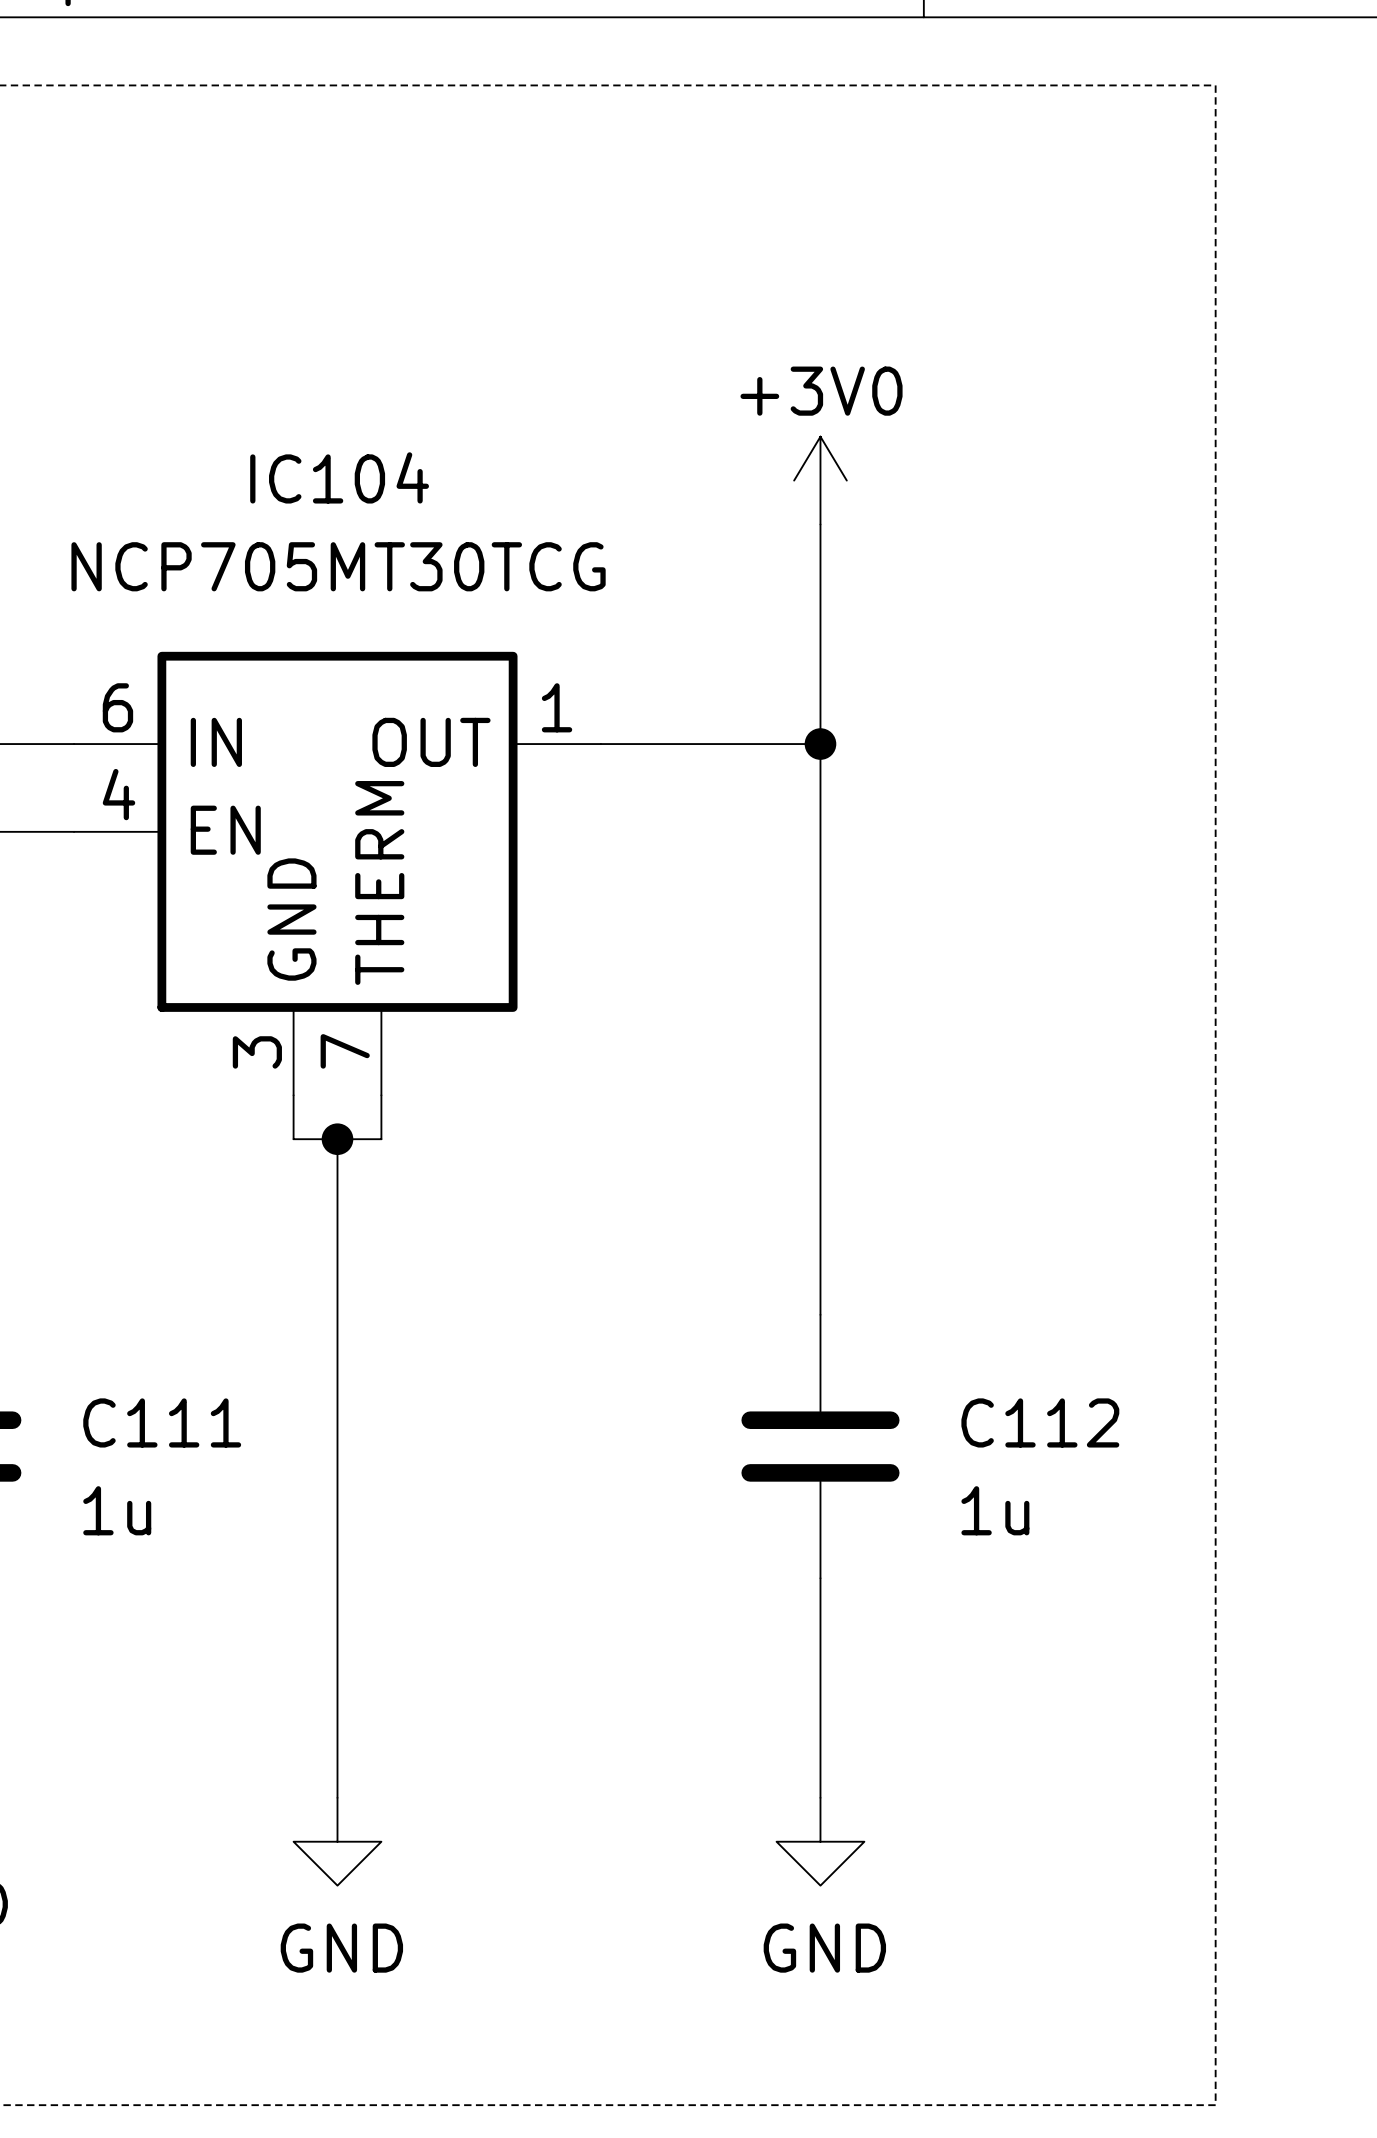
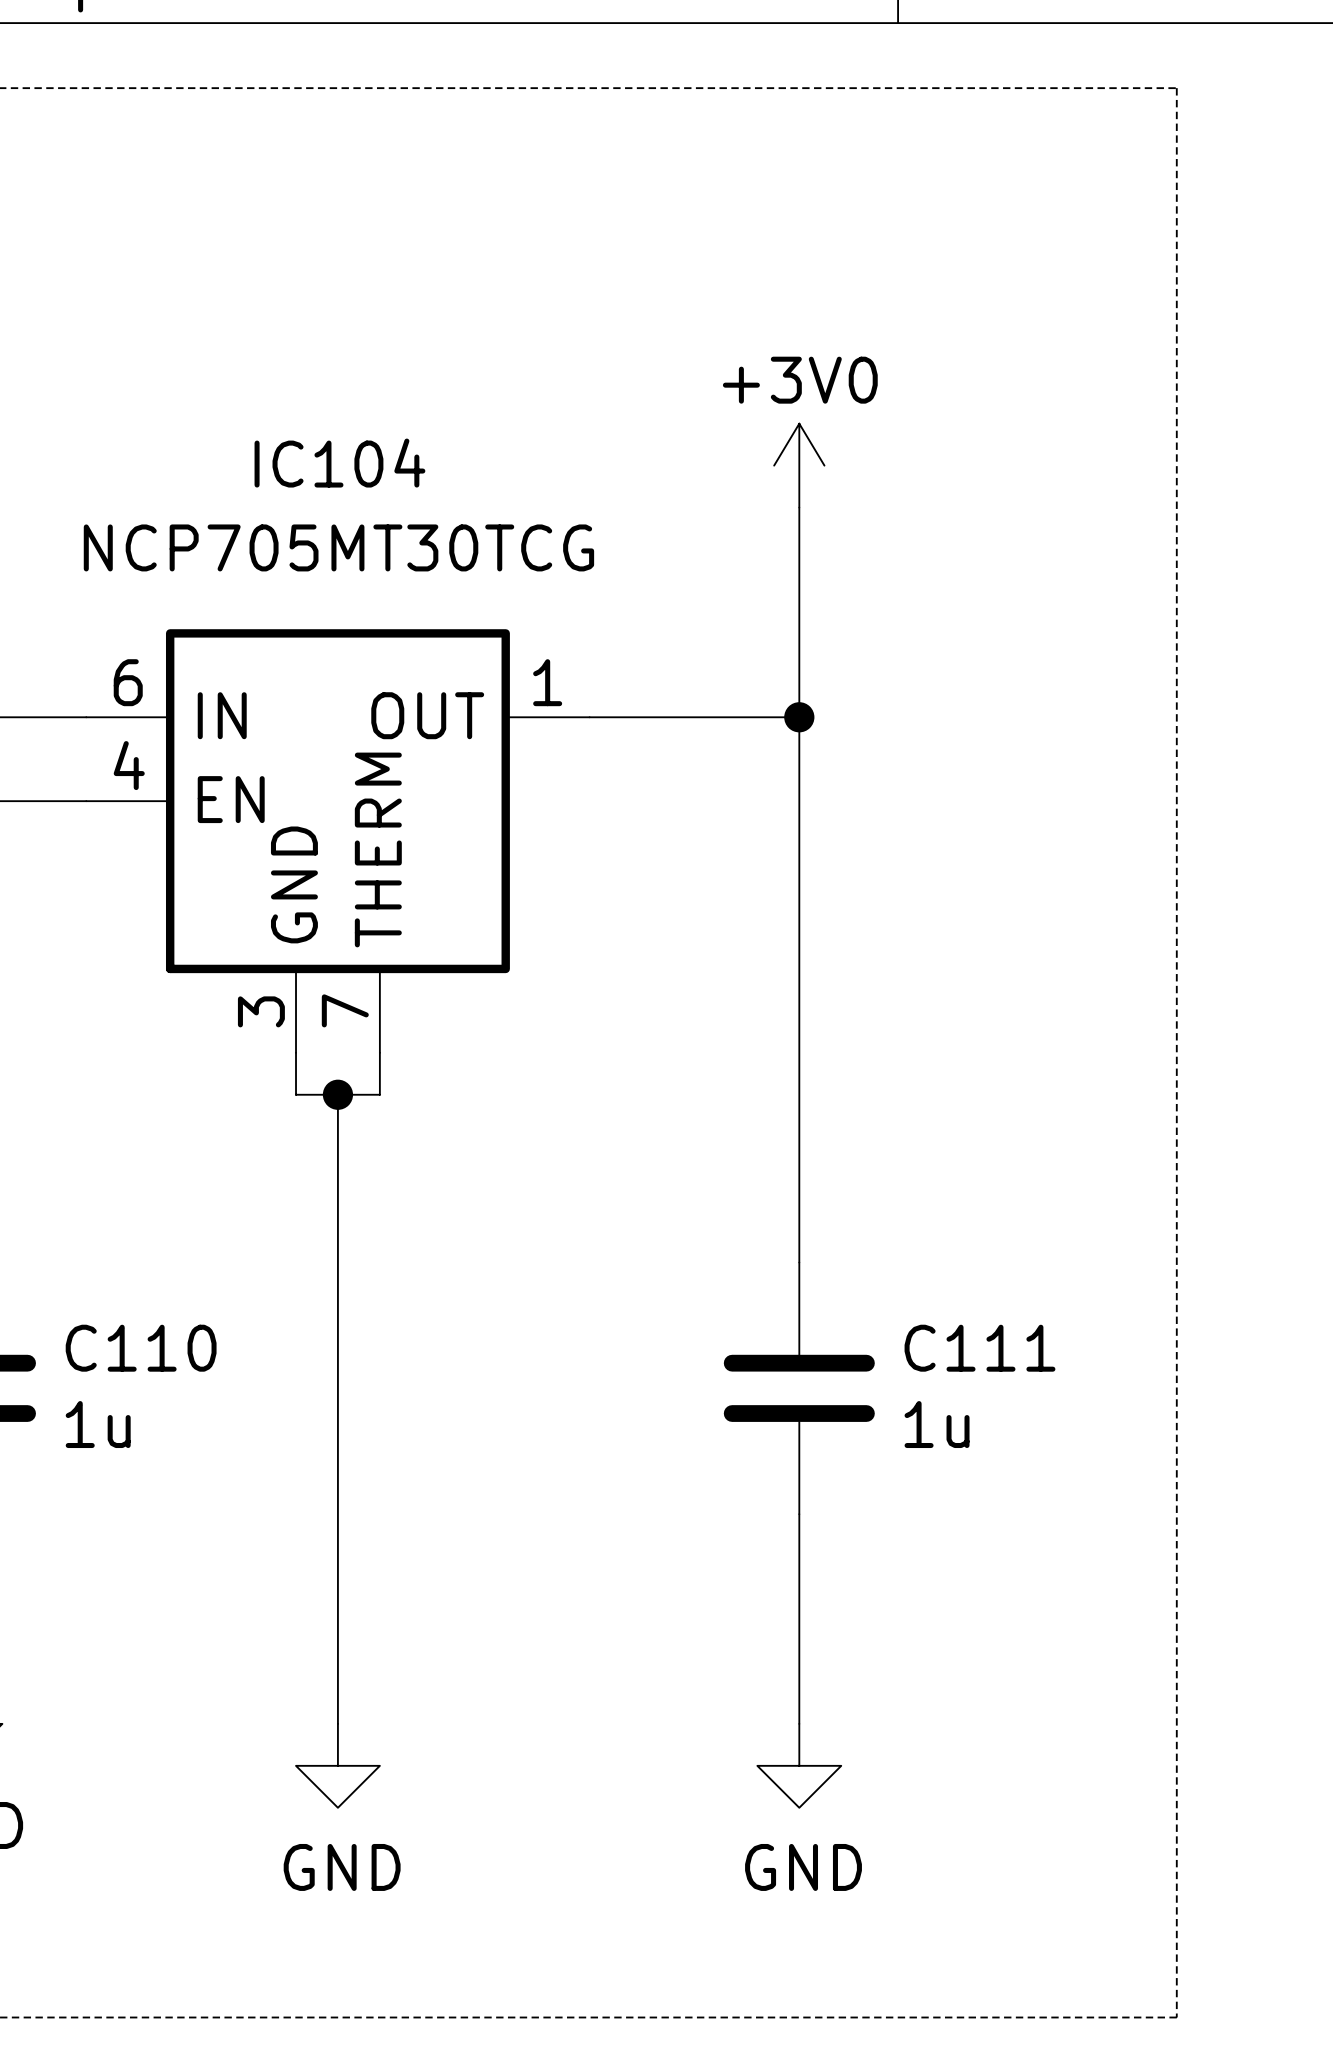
C111 name: C111 (162, 1422) -> C110 (141, 1348)
C112 name: C112 (1040, 1422) -> C111 (979, 1348)
C111 value position: 1u (117, 1510) -> 1u (98, 1424)
C112 value position: 1u (995, 1510) -> 1u (937, 1424)

